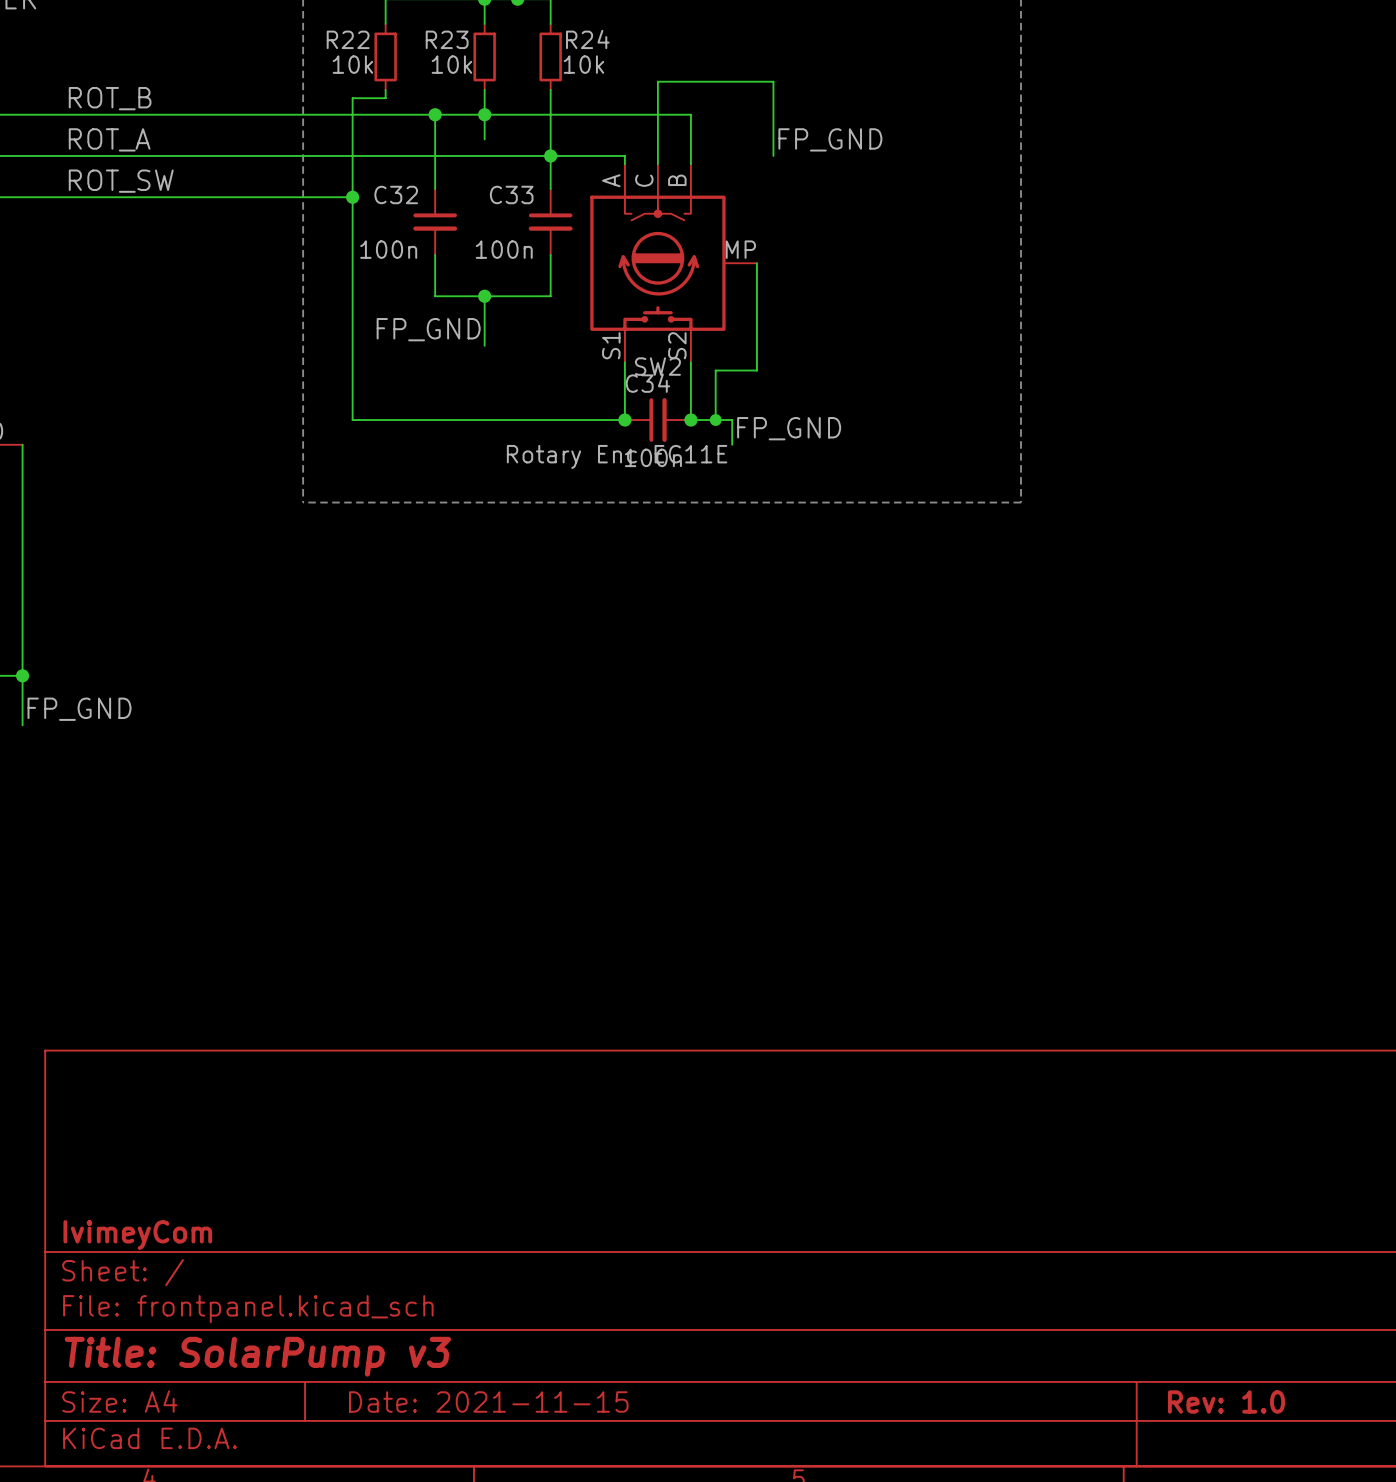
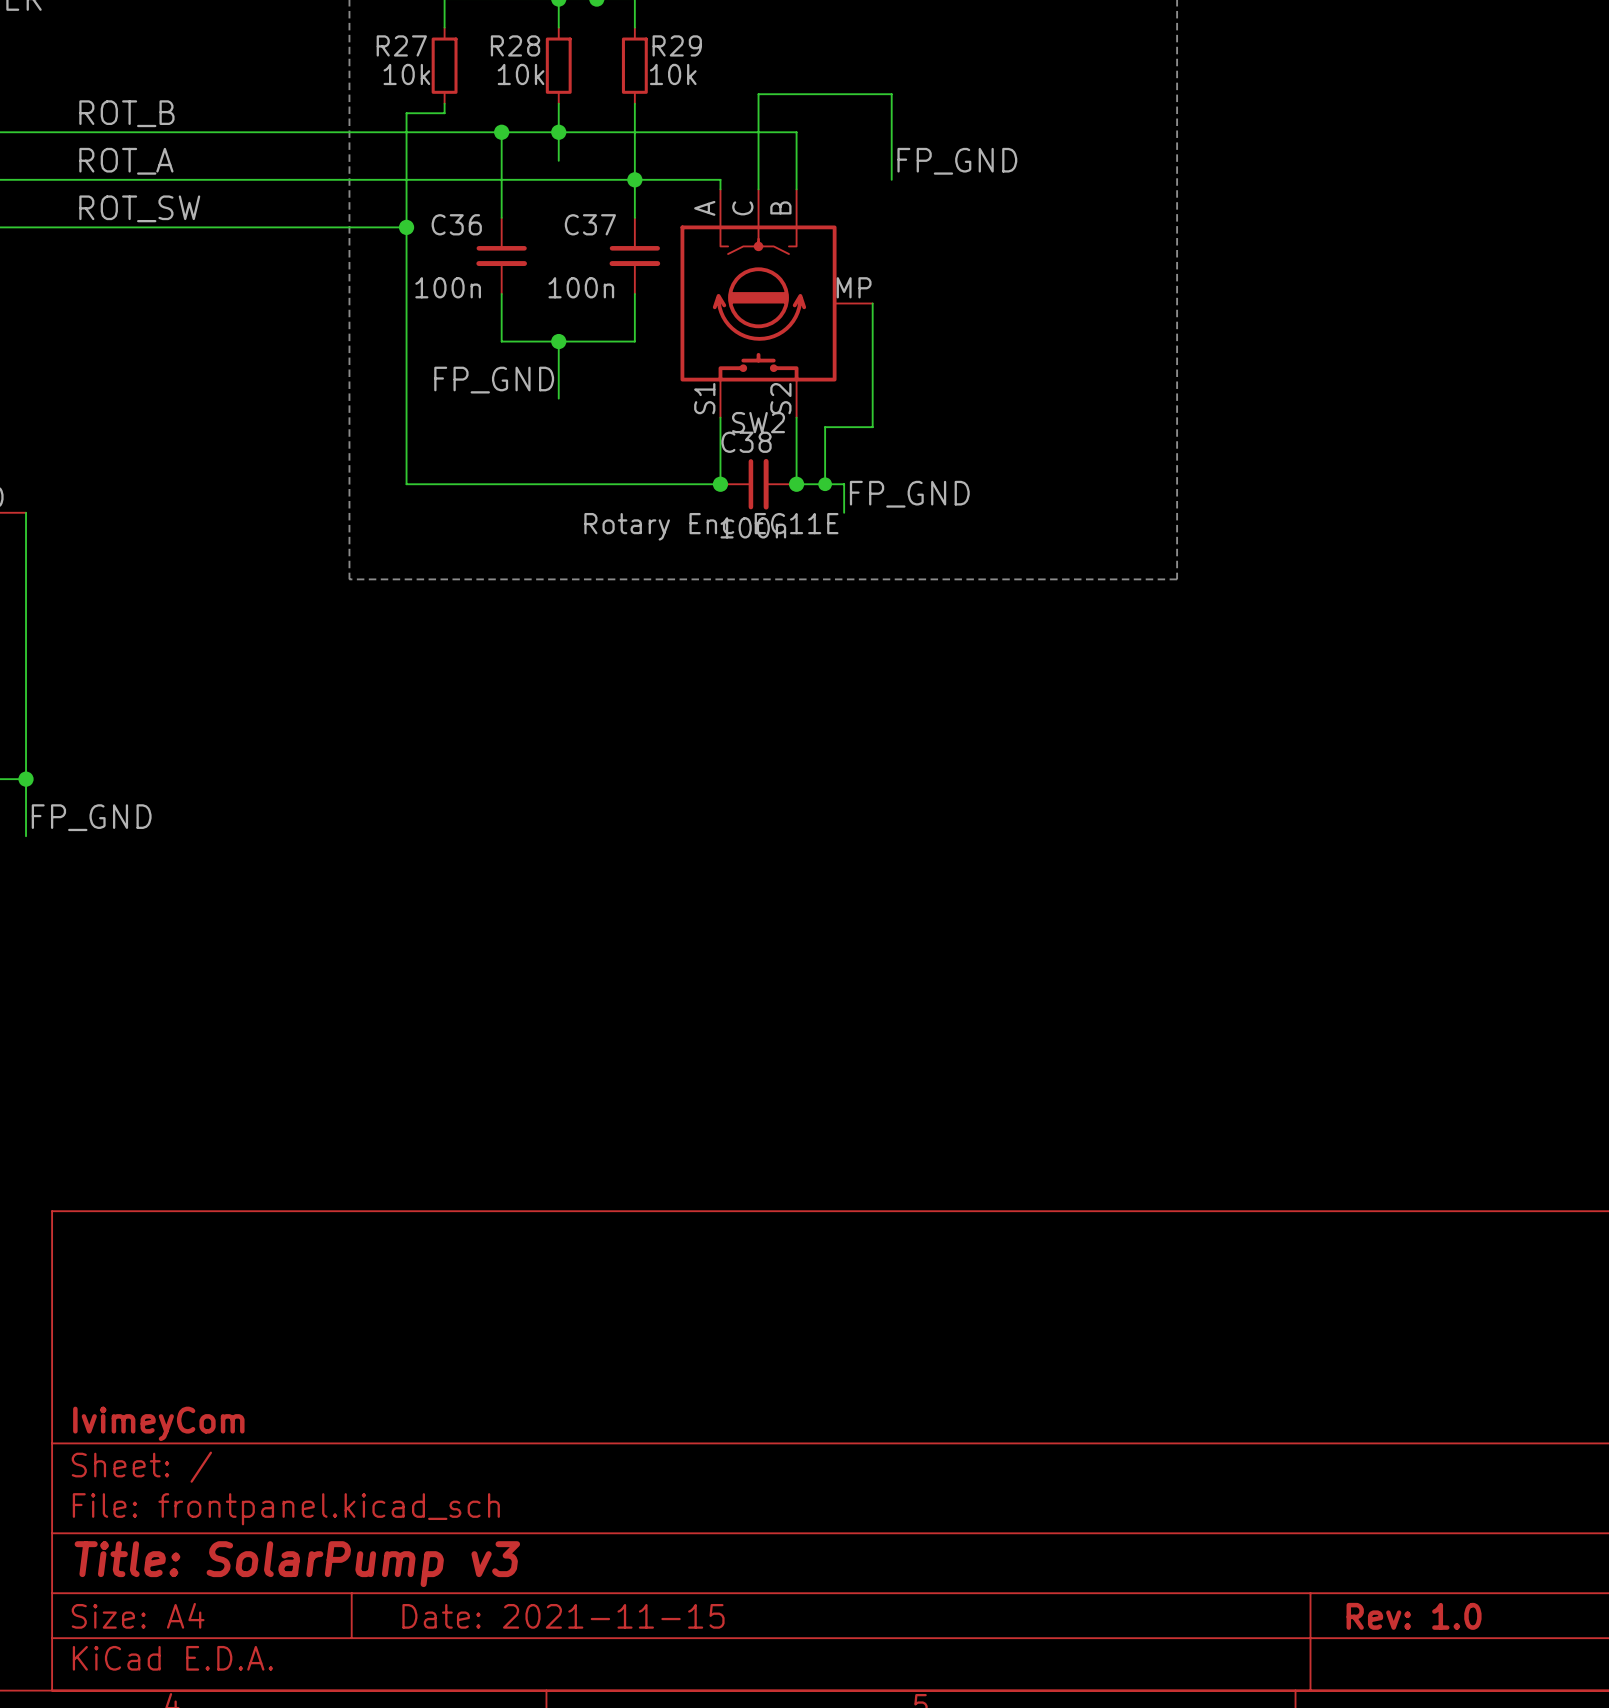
R22 name: R22 (348, 39) -> R27 (401, 45)
R23 name: R23 (447, 39) -> R28 (515, 45)
R24 name: R24 (587, 39) -> R29 (677, 45)
C32 name: C32 (396, 194) -> C36 (456, 224)
C33 name: C33 (511, 194) -> C37 (590, 224)
C34 name: C34 (647, 383) -> C38 (746, 442)

